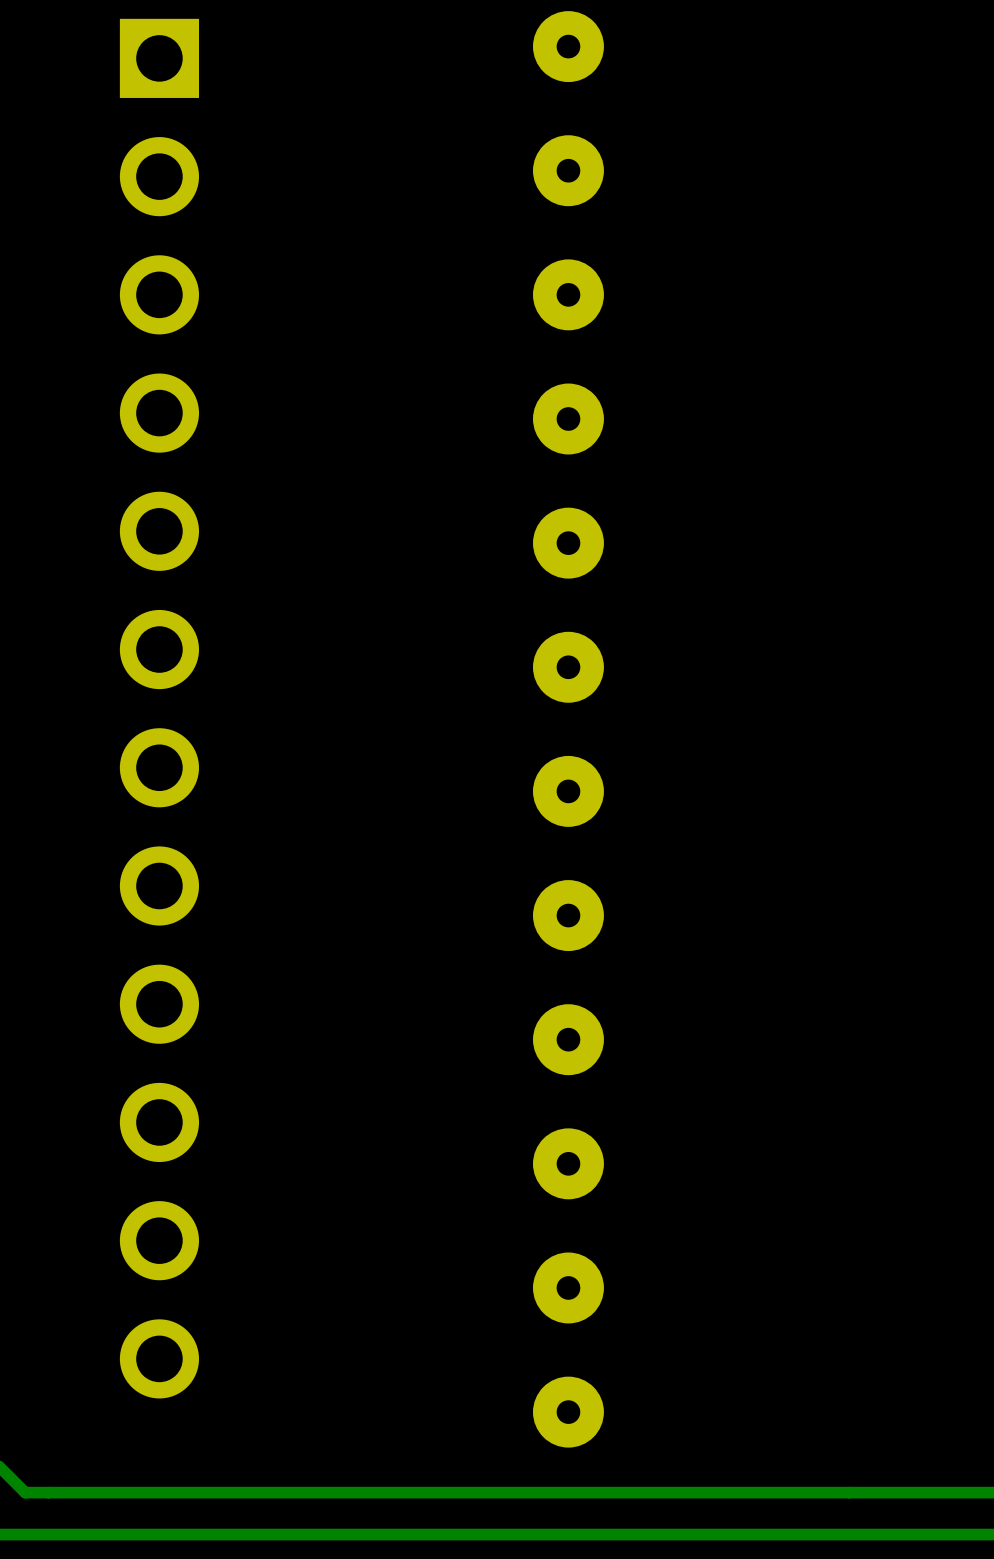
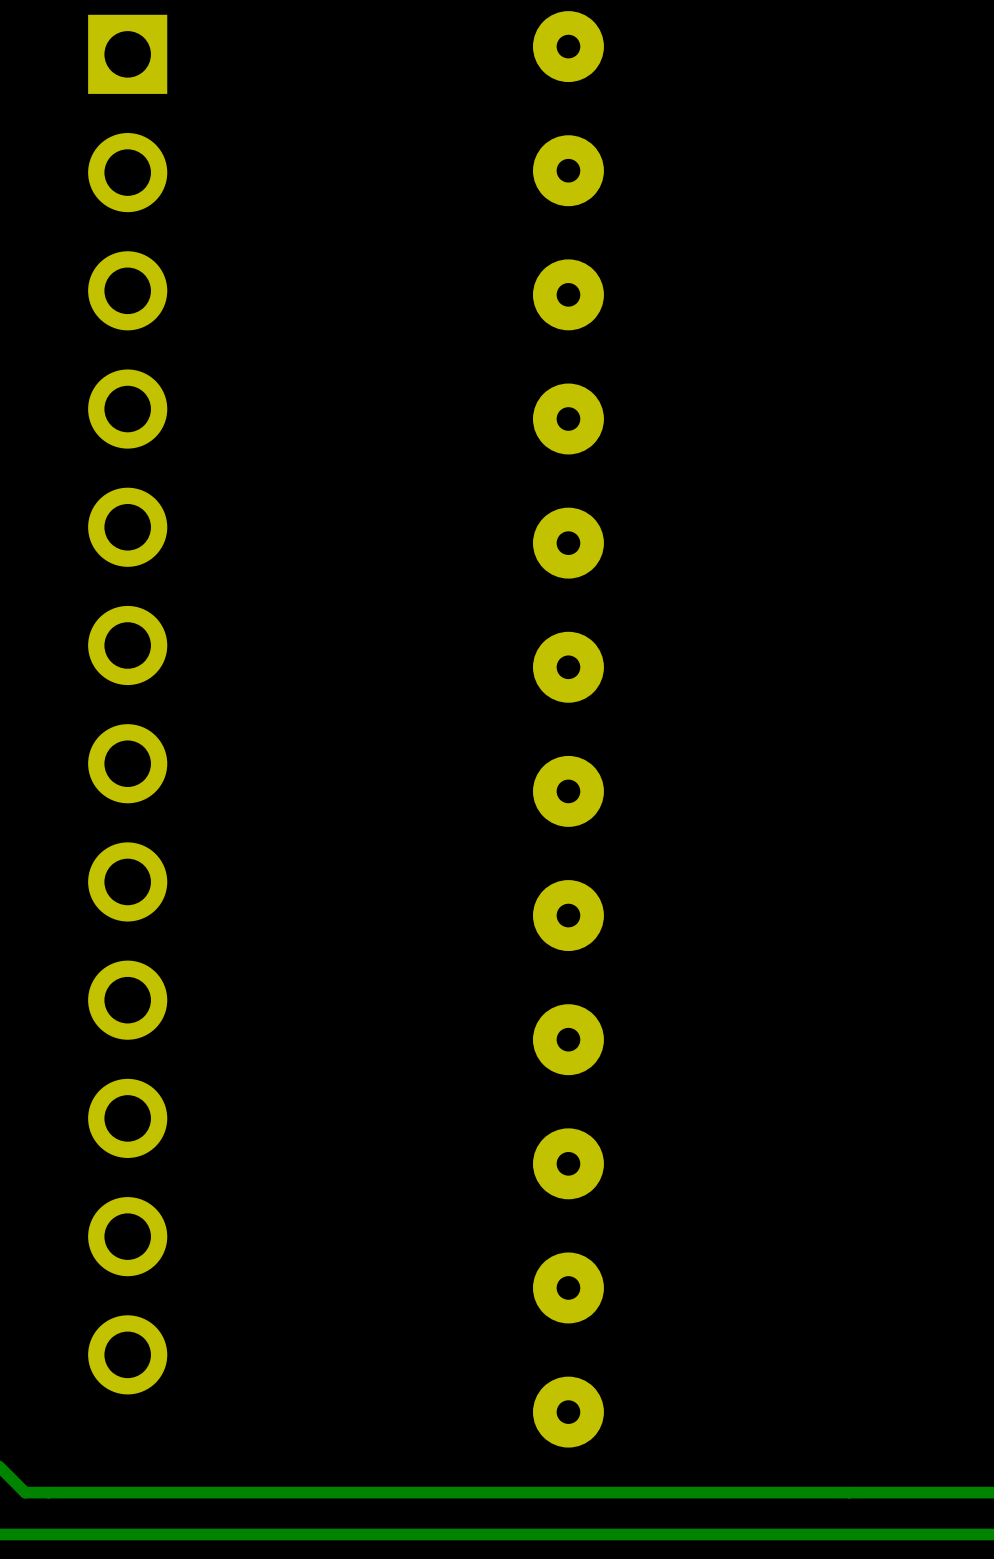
part position: (159, 708) -> (127, 704)

